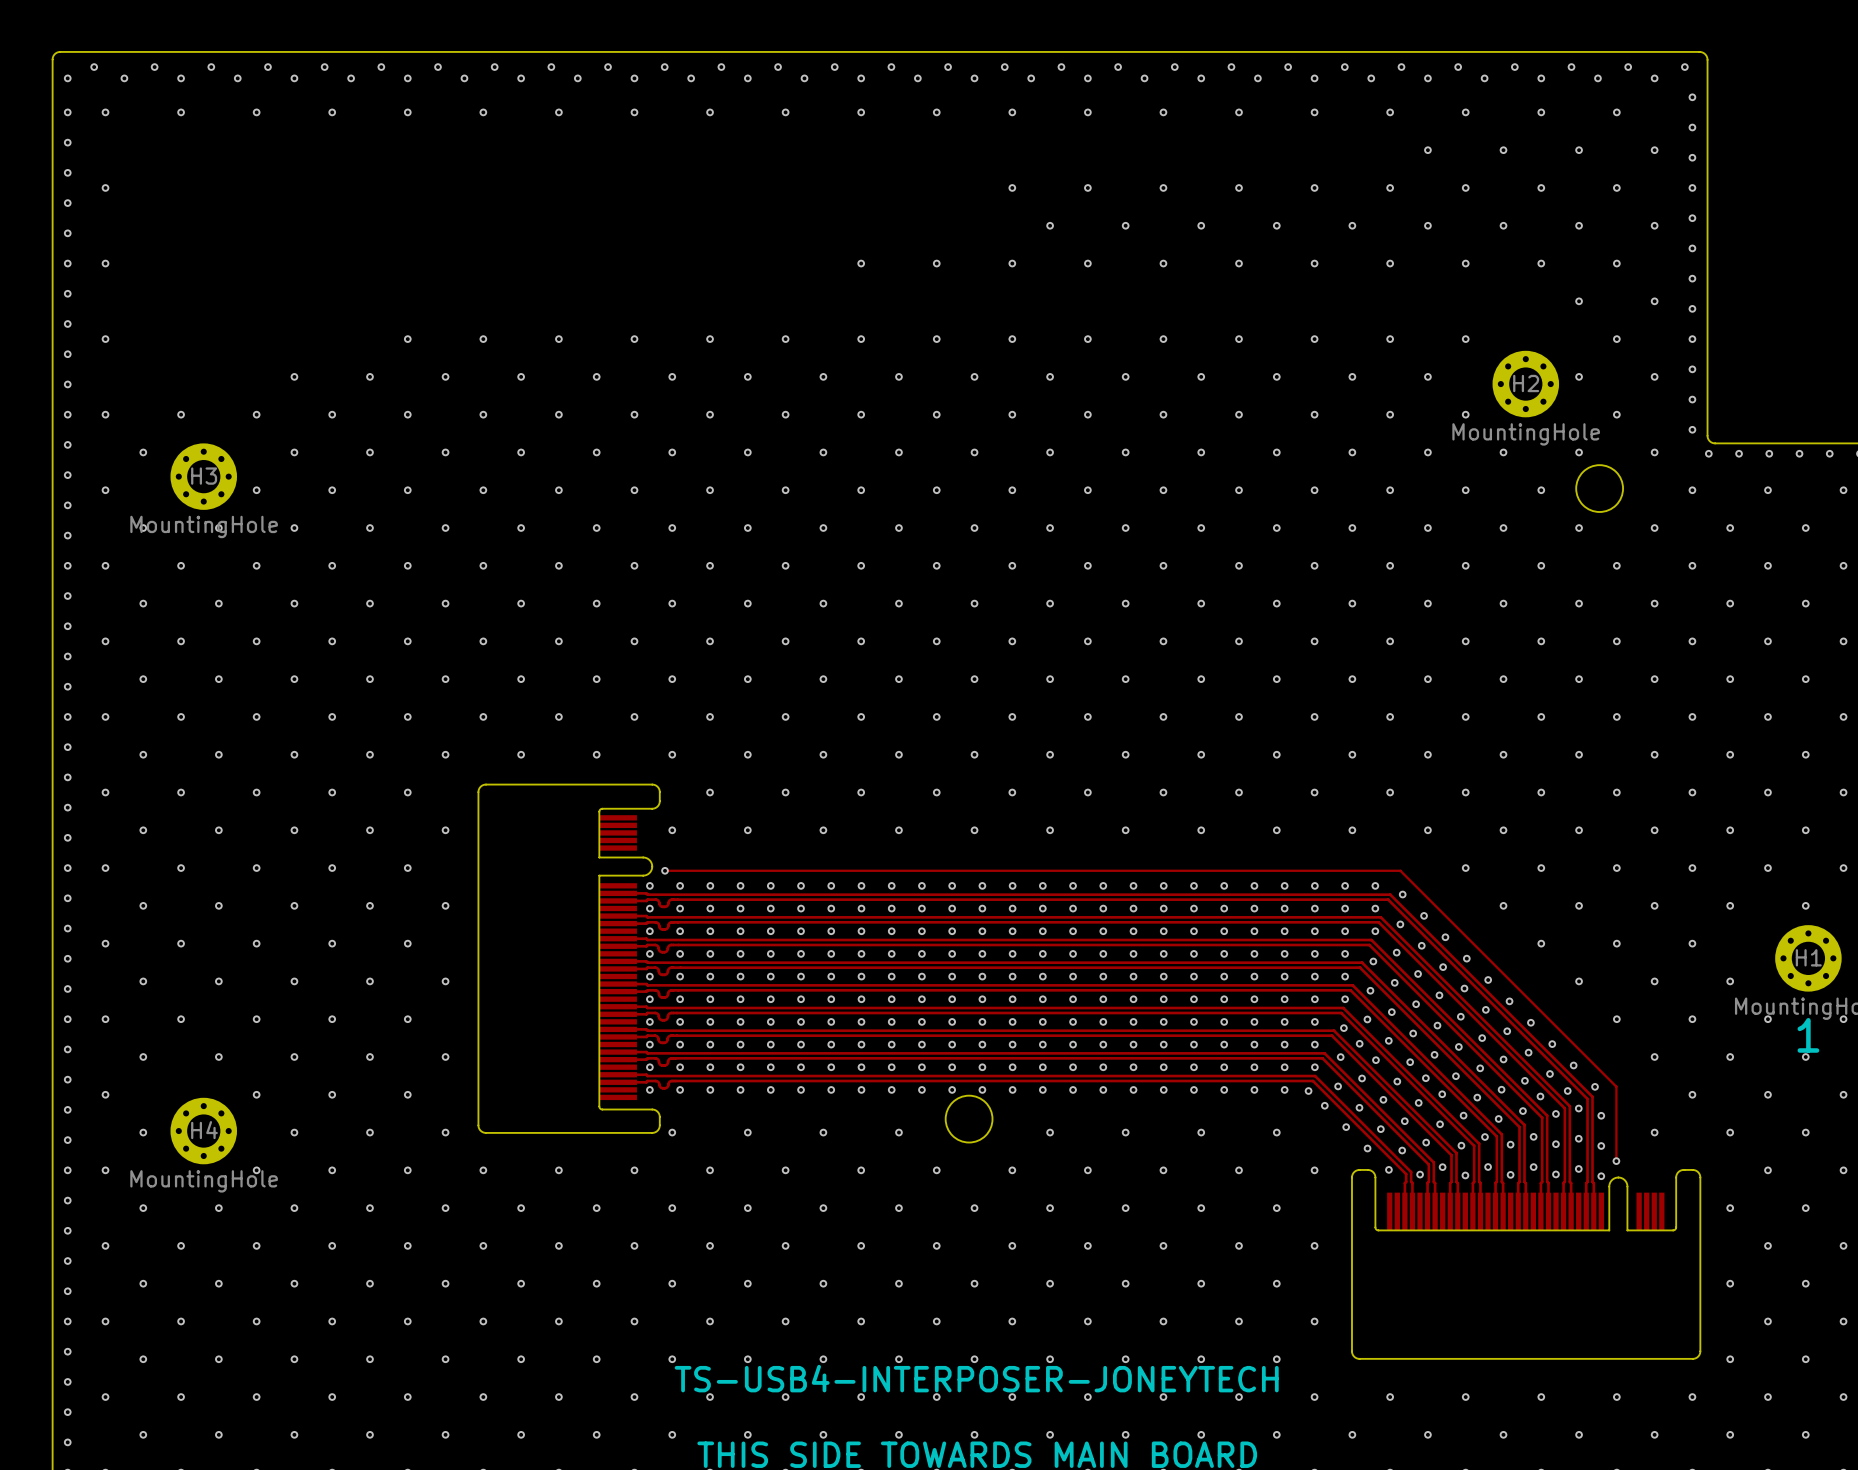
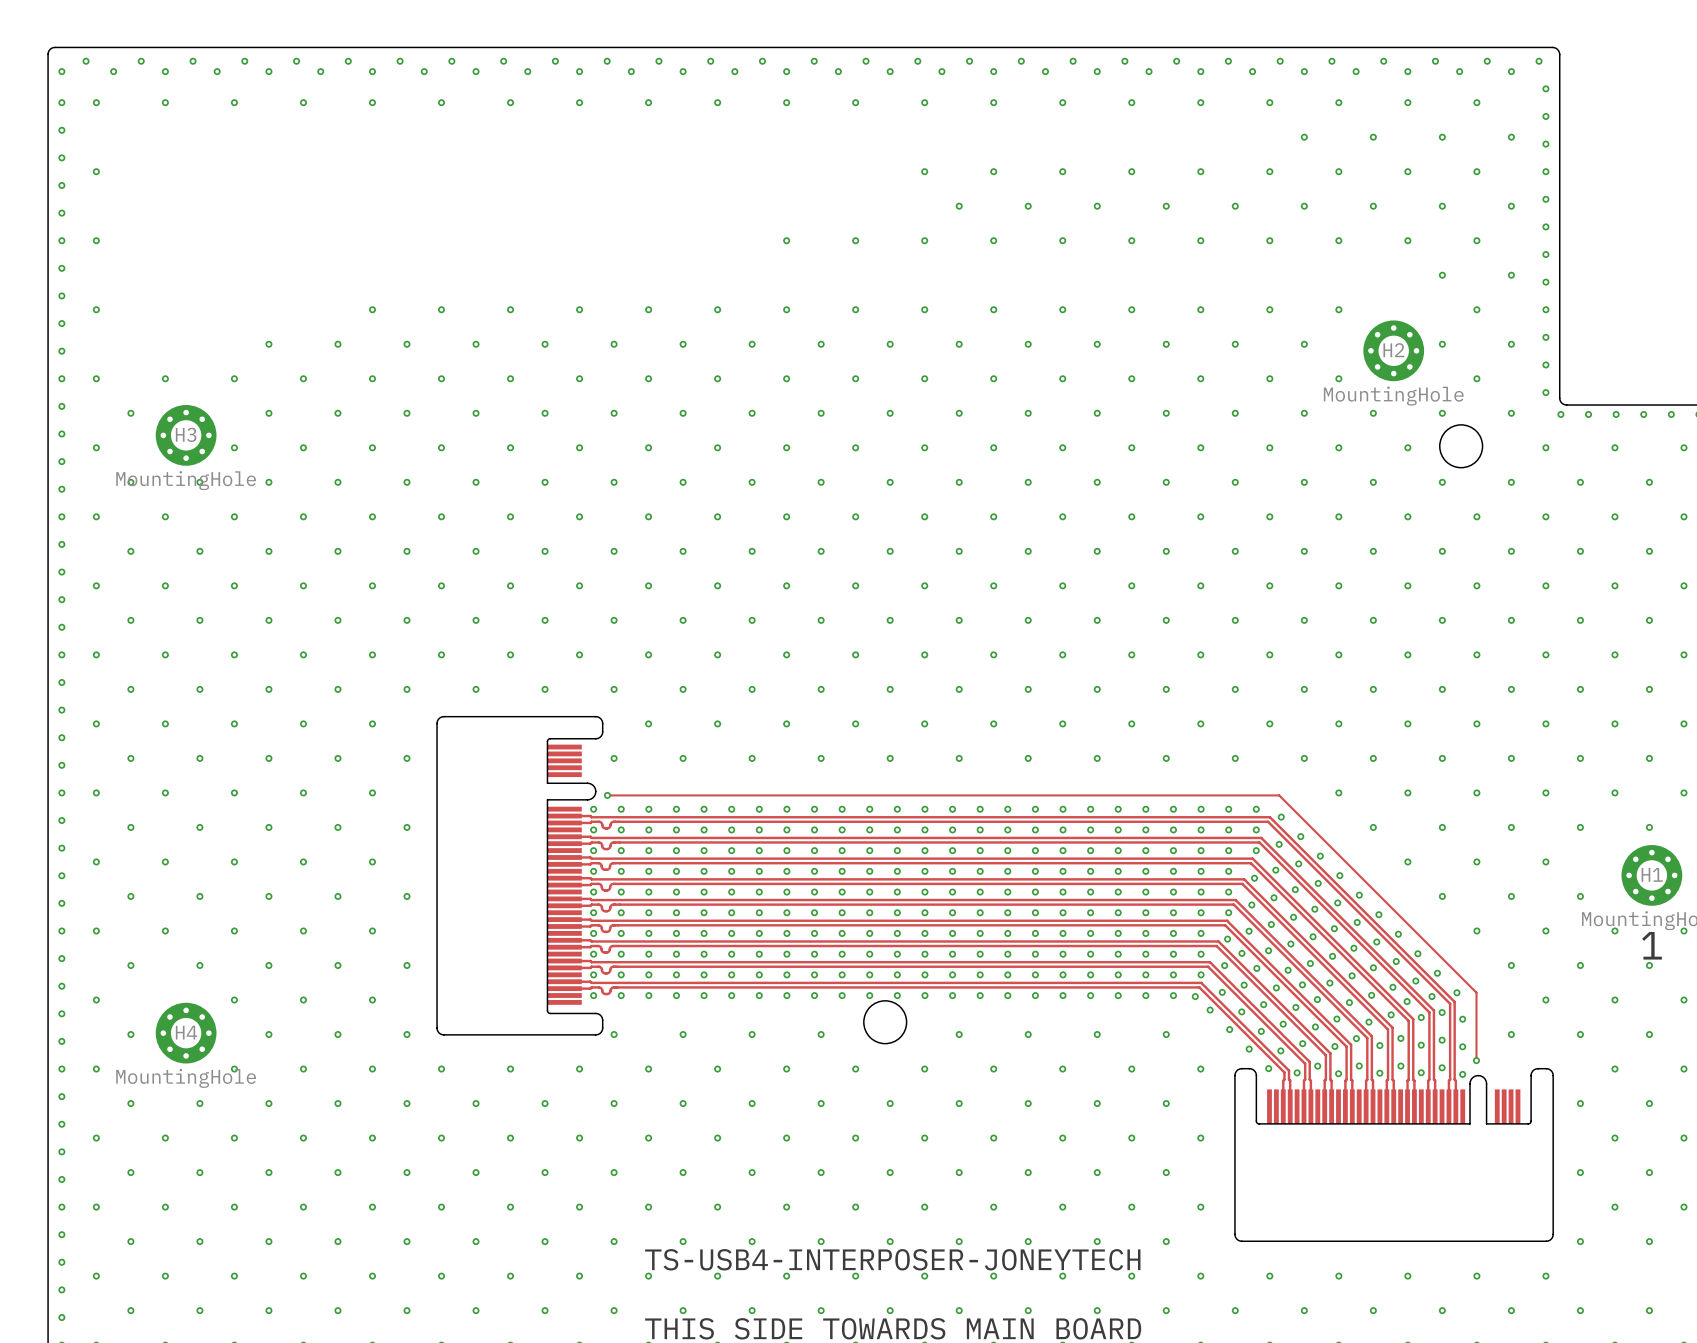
via: (1767, 1397) -> none
via: (1843, 1397) -> none

